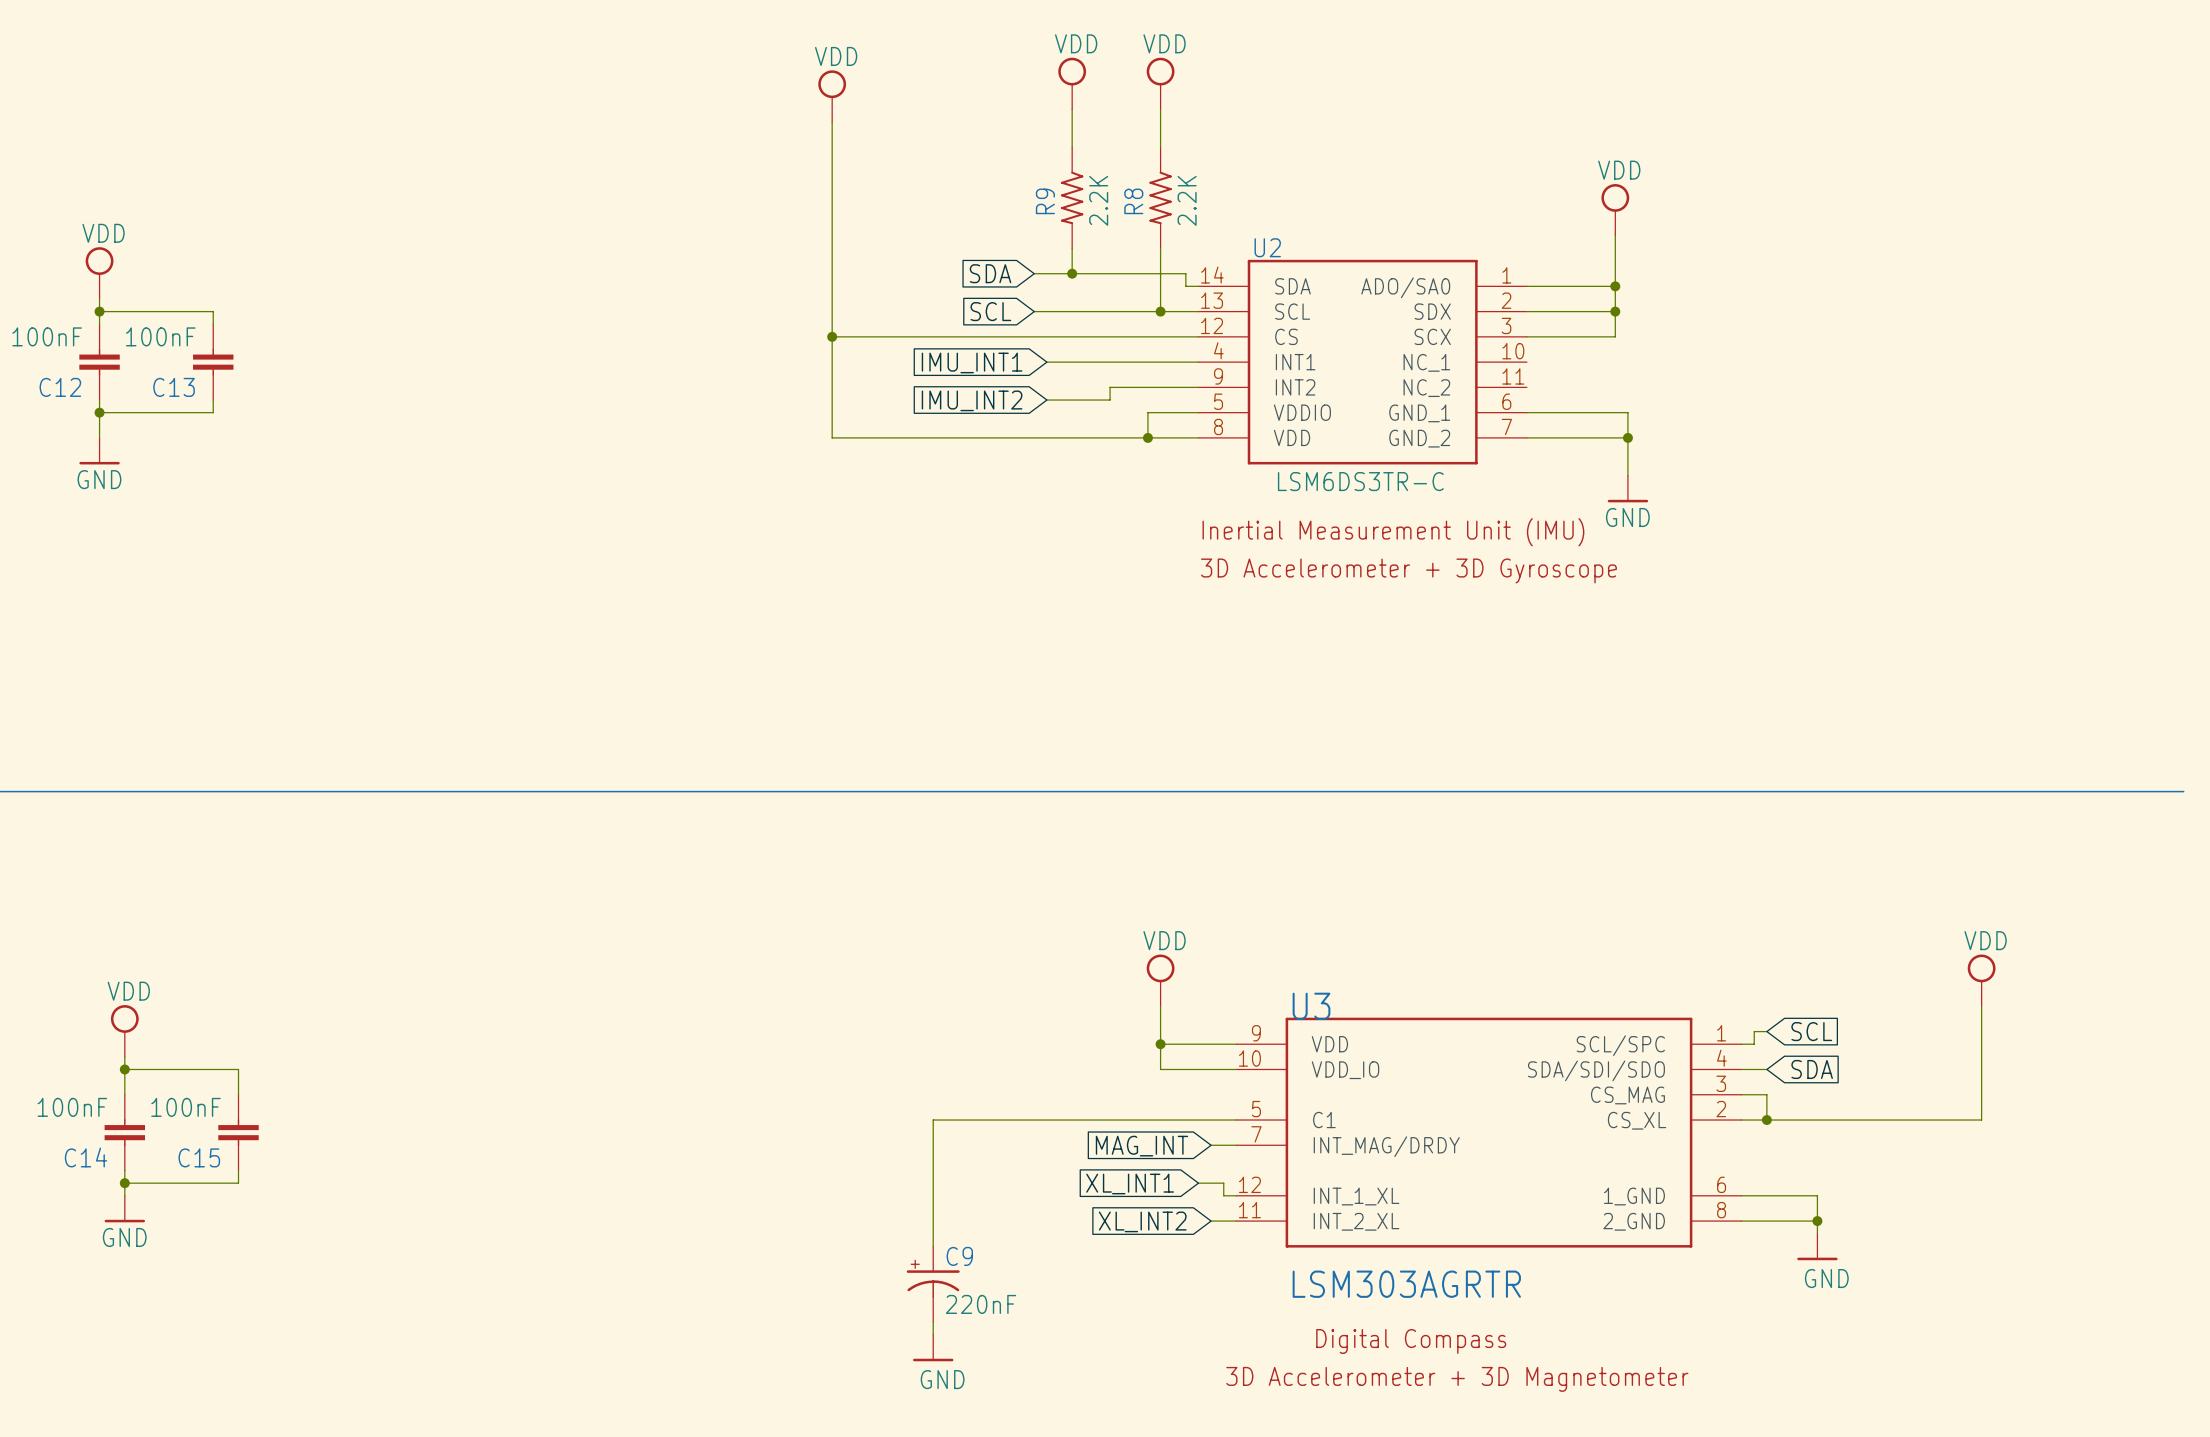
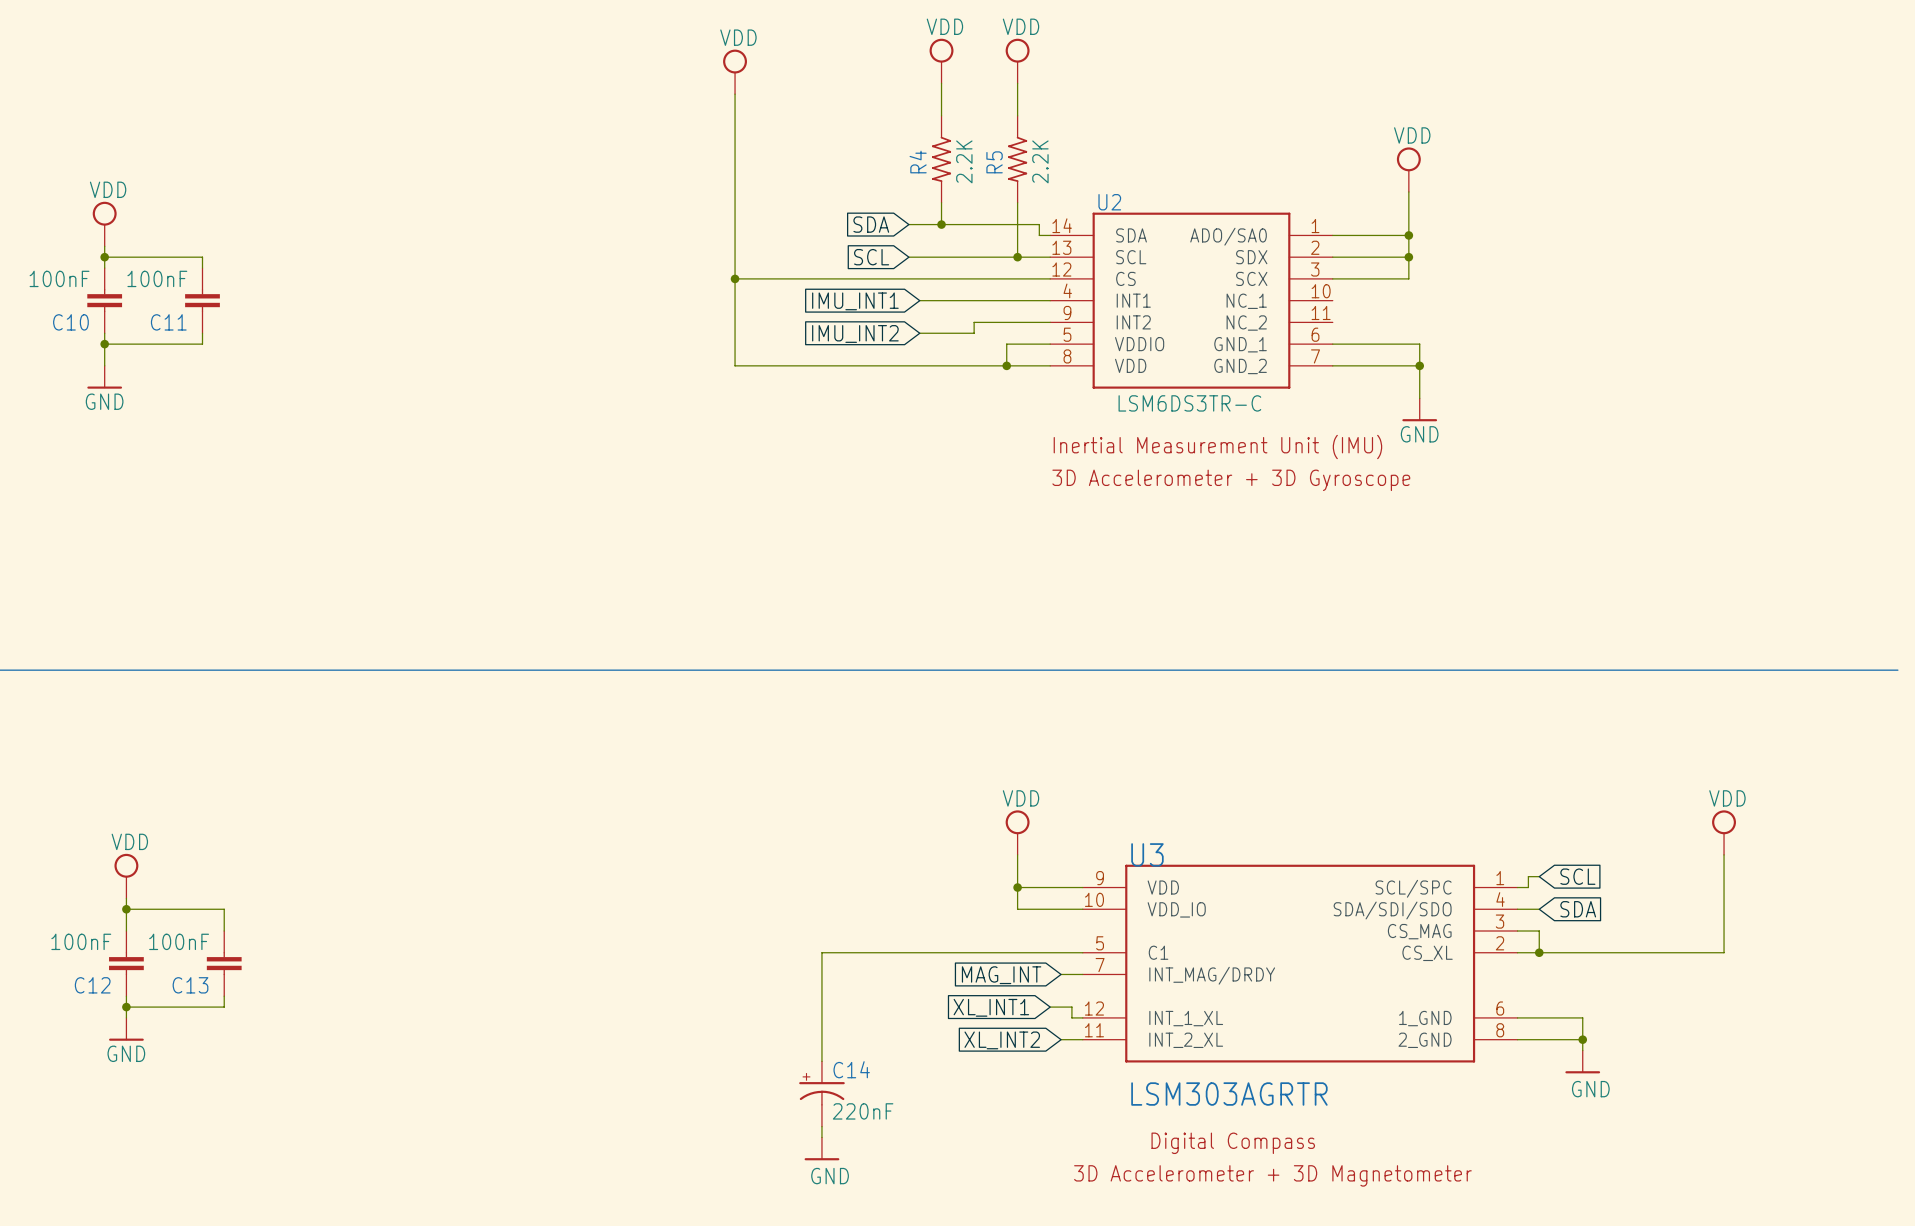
R9 name: R9 (1045, 201) -> R4 (918, 162)
R8 name: R8 (1133, 201) -> R5 (994, 162)
C12 name: C12 (60, 387) -> C10 (70, 322)
C13 name: C13 (174, 387) -> C11 (168, 322)
C14 name: C14 (85, 1157) -> C12 (92, 985)
C15 name: C15 (199, 1157) -> C13 (190, 985)
C9 name: C9 (959, 1256) -> C14 (851, 1069)

